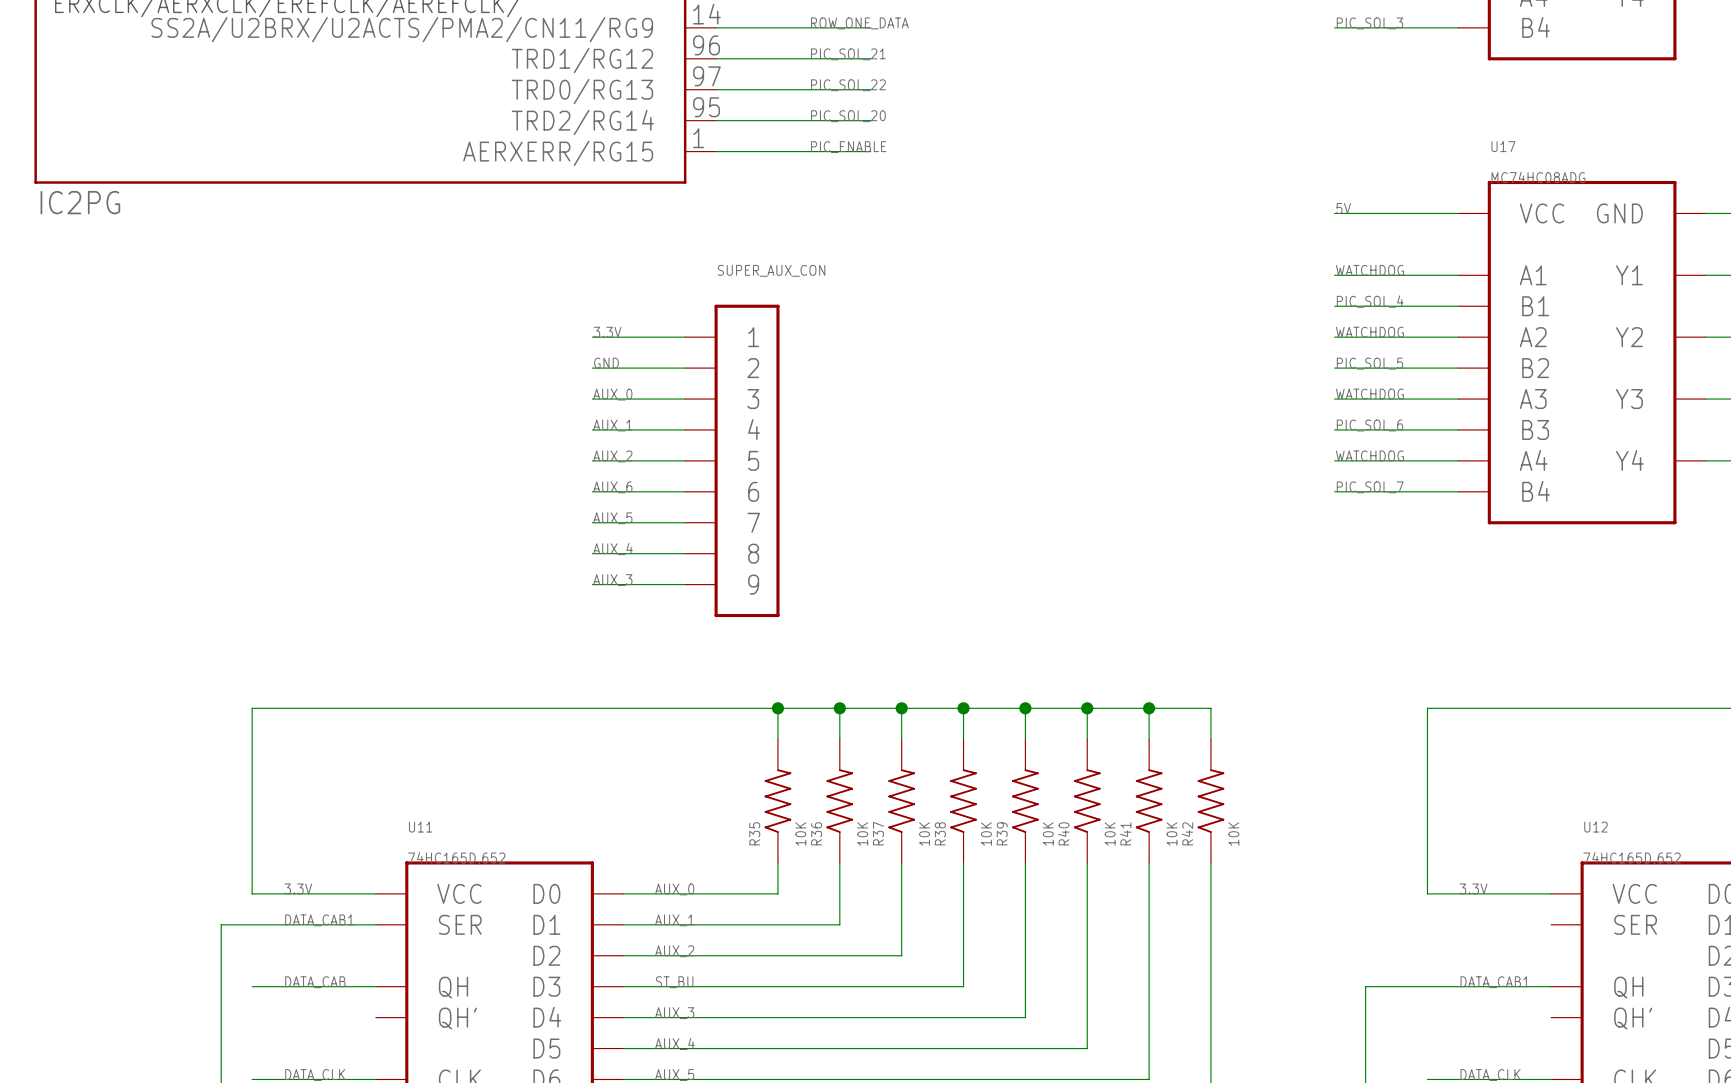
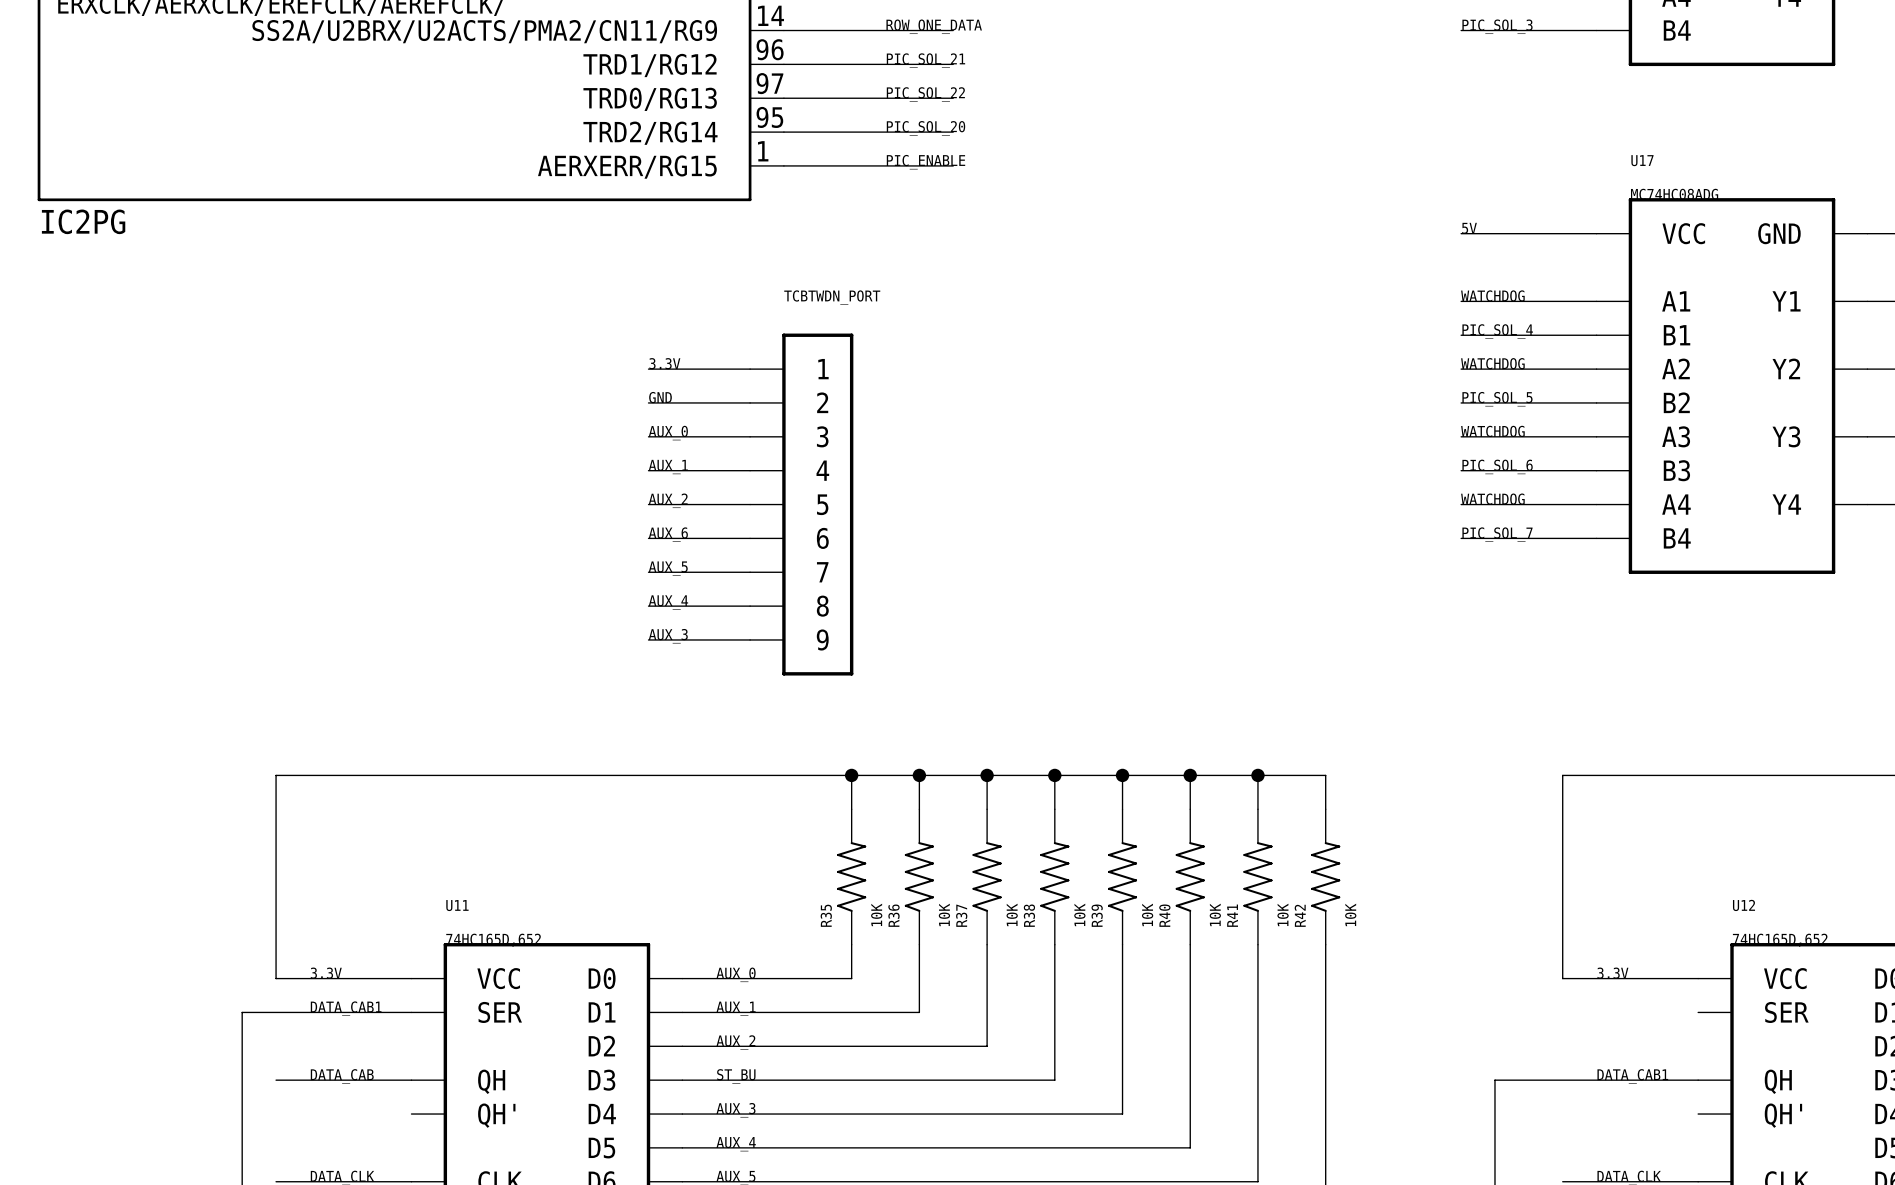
SUPER_AUX_CON name: SUPER_AUX_CON (771, 270) -> TCBTWDN_PORT (832, 297)

